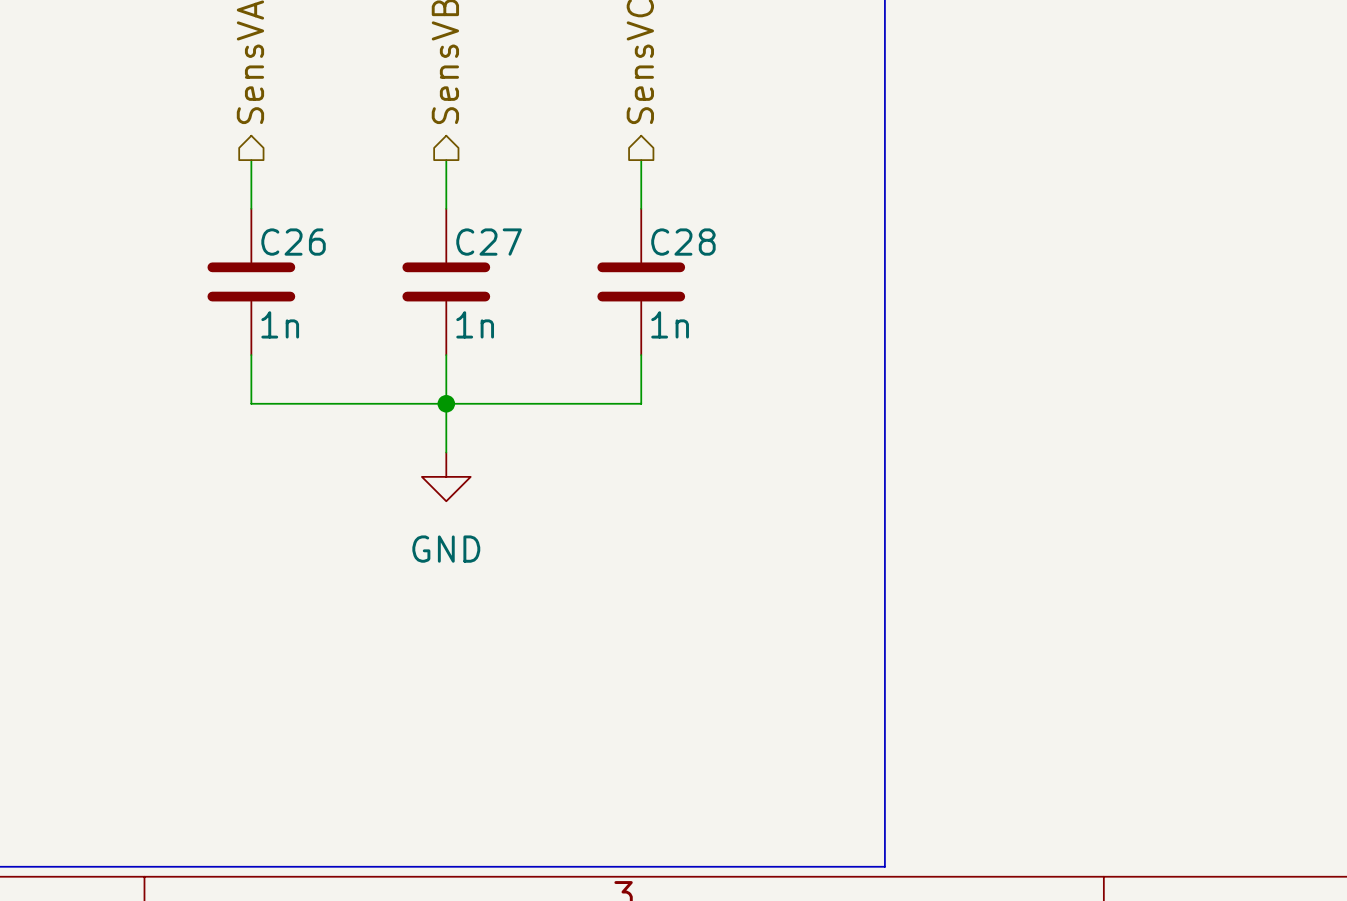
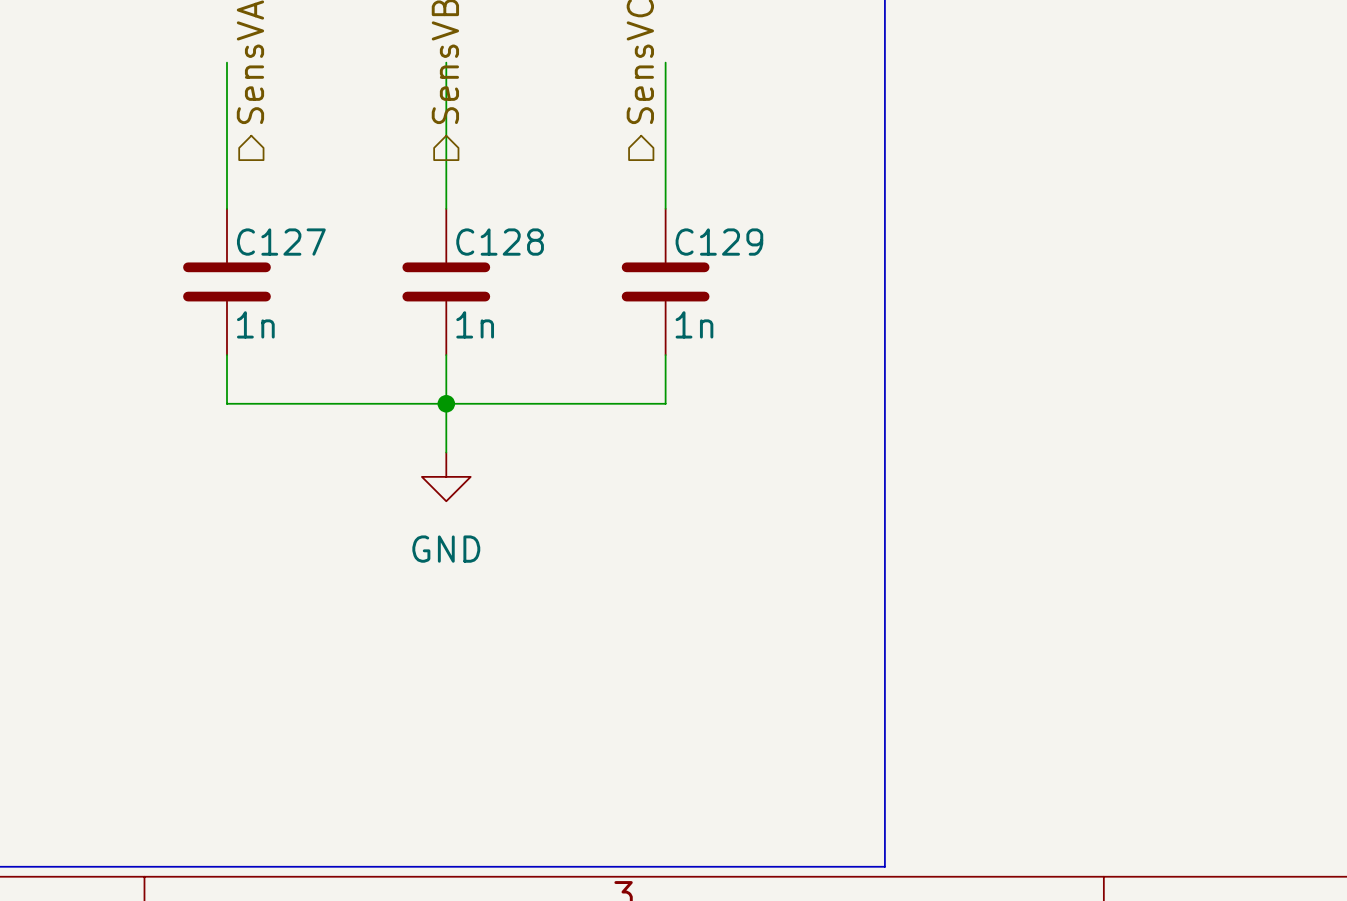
wire: none -> (226, 62) (226, 208)
wire: none -> (446, 62) (446, 160)
wire: none -> (665, 62) (665, 208)
wire: (251, 160) (251, 208) -> none
wire: (641, 160) (641, 208) -> none
C27 name: C27 (489, 242) -> C128 (500, 242)
C127: none -> 1n (226, 281)
C26: 1n (251, 281) -> none
C28: 1n (641, 281) -> none
C129: none -> 1n (665, 281)
wire: (251, 355) (251, 403) -> (226, 355) (226, 403) (251, 403)
wire: (641, 355) (641, 403) -> (665, 355) (665, 403) (641, 403)

